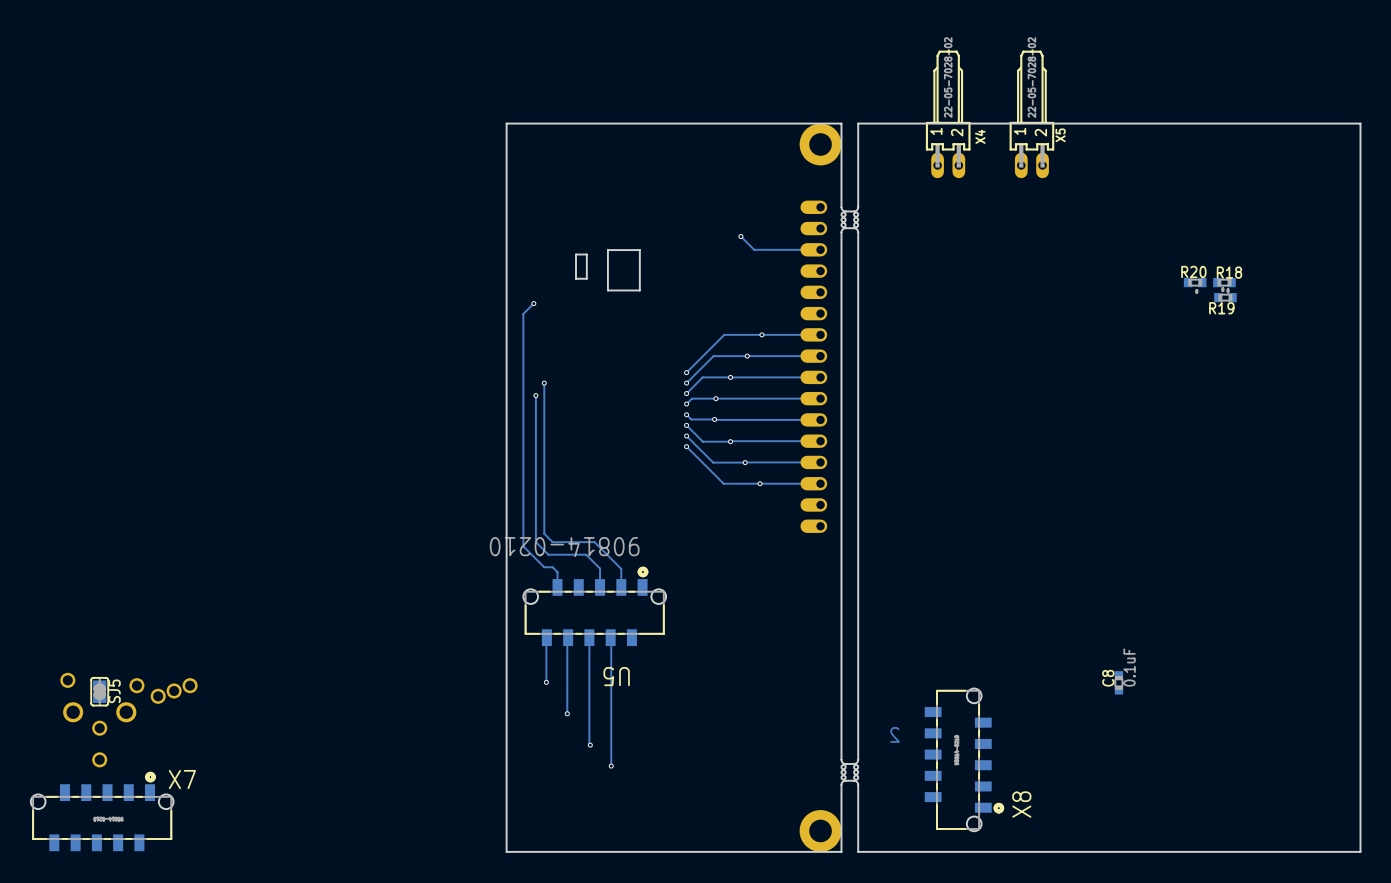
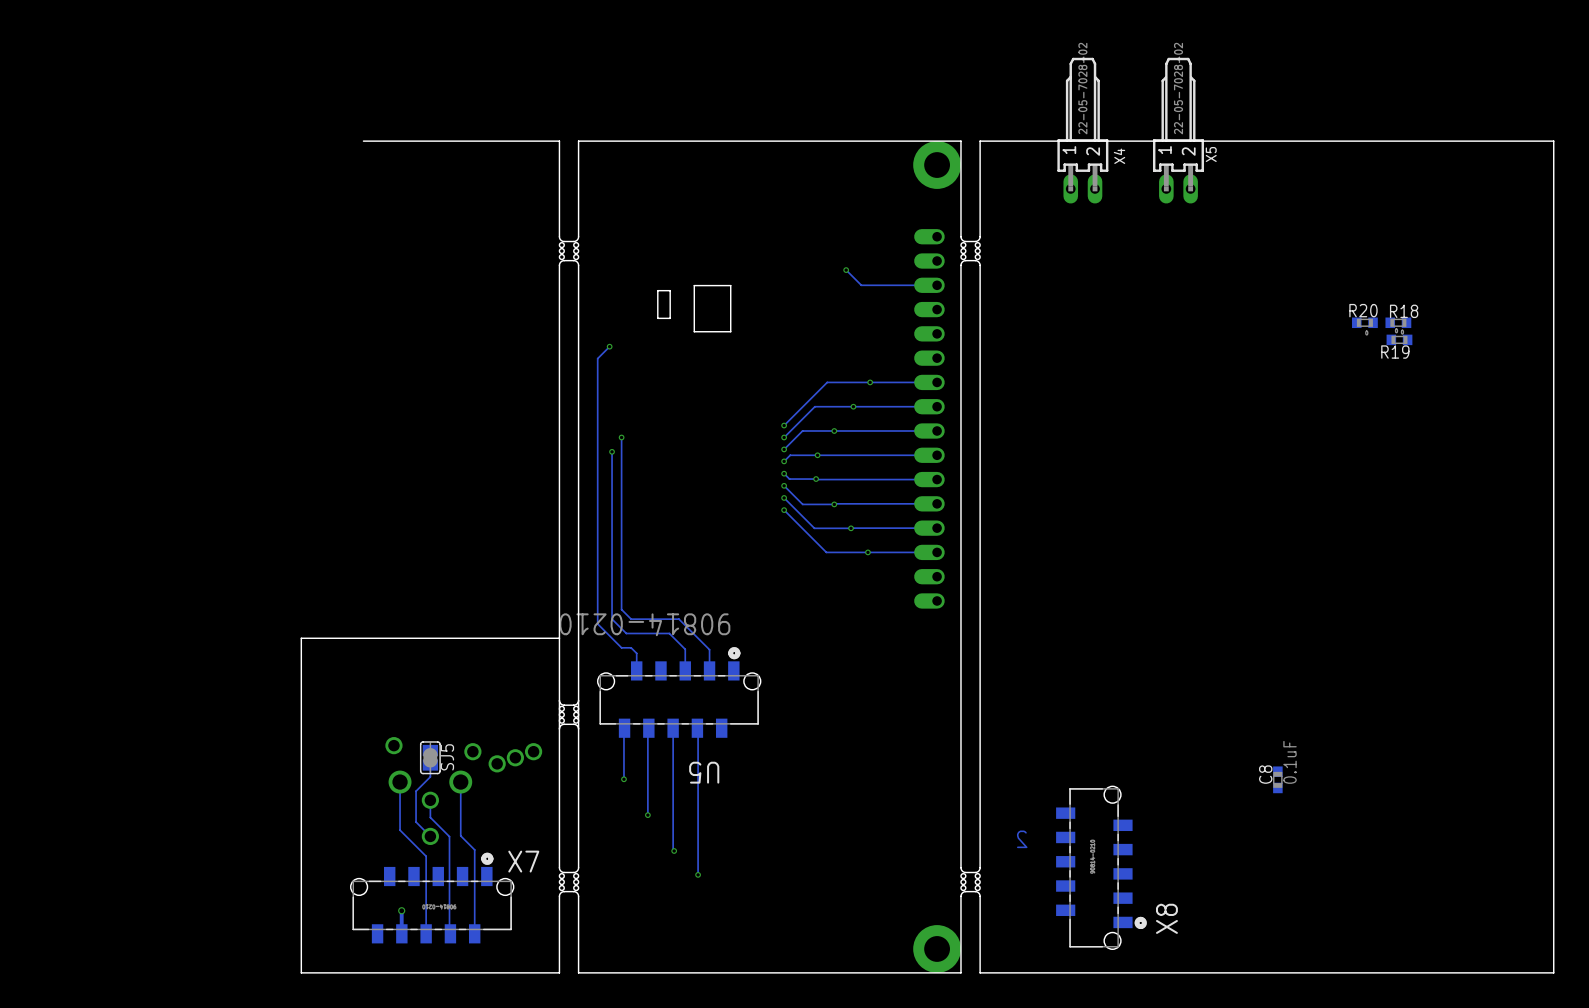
board edge: (506, 207) (506, 232) -> (578, 236) (573, 241) (562, 241) (559, 237) (559, 141) (363, 141)
hole: none -> (561, 245)
hole: none -> (576, 245)
hole: none -> (561, 251)
hole: none -> (576, 251)
hole: none -> (561, 257)
hole: none -> (576, 257)
board edge: none -> (578, 265) (573, 260) (562, 260) (559, 265) (559, 867) (564, 872) (575, 872) (578, 867)
board edge: none -> (578, 700) (573, 705) (562, 705) (559, 700)
hole: none -> (561, 708)
hole: none -> (576, 708)
hole: none -> (561, 714)
hole: none -> (576, 714)
hole: none -> (561, 720)
hole: none -> (576, 720)
board edge: none -> (578, 729) (573, 724) (562, 724) (559, 729)
track: none -> (430, 765) (430, 776) (416, 791) (416, 822) (430, 836)
track: none -> (400, 782) (400, 830) (426, 856) (426, 933)
track: none -> (460, 782) (460, 835) (474, 849) (474, 933)
SJ5 position: (99, 691) -> (430, 757)
part: none -> (463, 791)
track: none -> (430, 800) (430, 817) (449, 836) (450, 933)
part: (128, 720) -> none
board edge: (506, 759) (506, 784) -> (559, 638) (301, 638) (301, 972) (559, 972) (559, 895) (562, 891) (573, 891) (578, 896)
hole: none -> (561, 876)
hole: none -> (576, 876)
hole: none -> (561, 882)
hole: none -> (576, 882)
hole: none -> (561, 888)
hole: none -> (576, 888)
track: none -> (401, 910) (401, 933)
via: none -> (401, 910)
X7 position: (102, 811) -> (432, 898)

